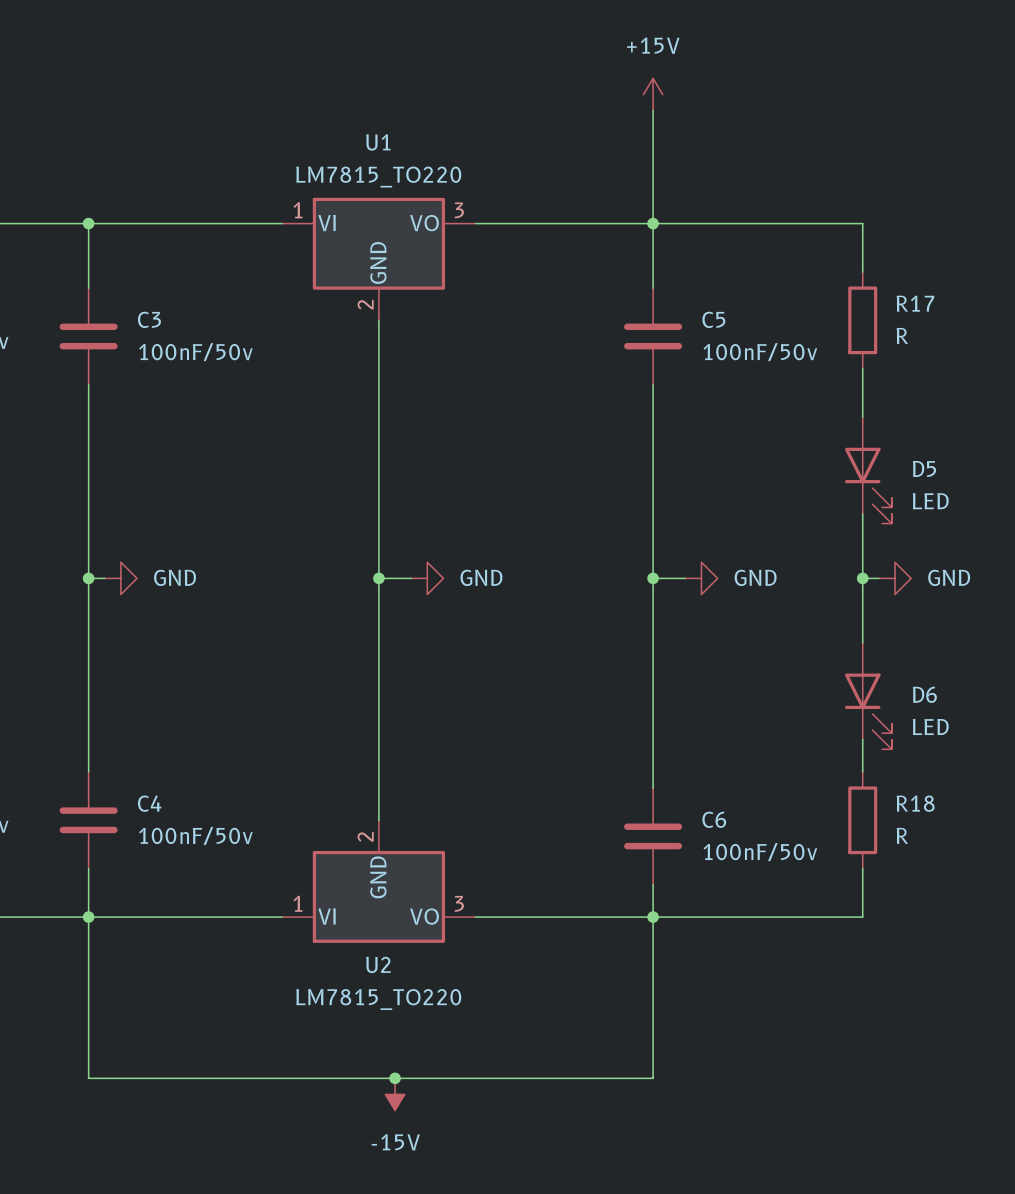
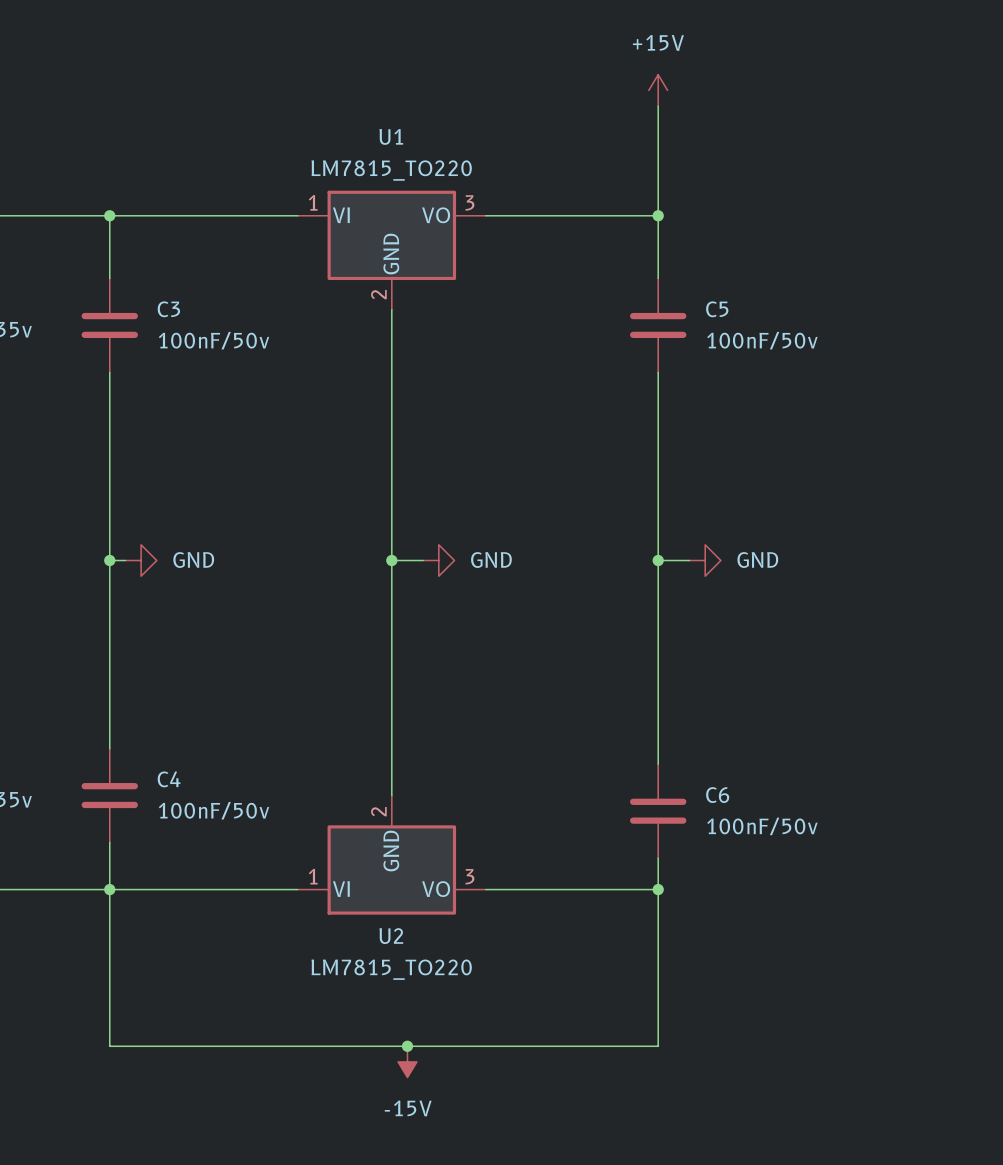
wire: (653, 223) (862, 223) (862, 271) -> none
R17: R (862, 320) -> none
wire: (862, 368) (862, 417) -> none
D5: LED (868, 470) -> none
wire: (862, 513) (862, 642) -> none
wire: (862, 578) (878, 578) -> none
junction: (862, 578) -> none
power symbol: GND (894, 578) -> none
D6: LED (868, 696) -> none
wire: (862, 739) (862, 771) -> none
R18: R (862, 820) -> none
wire: (862, 868) (862, 917) (653, 917) -> none

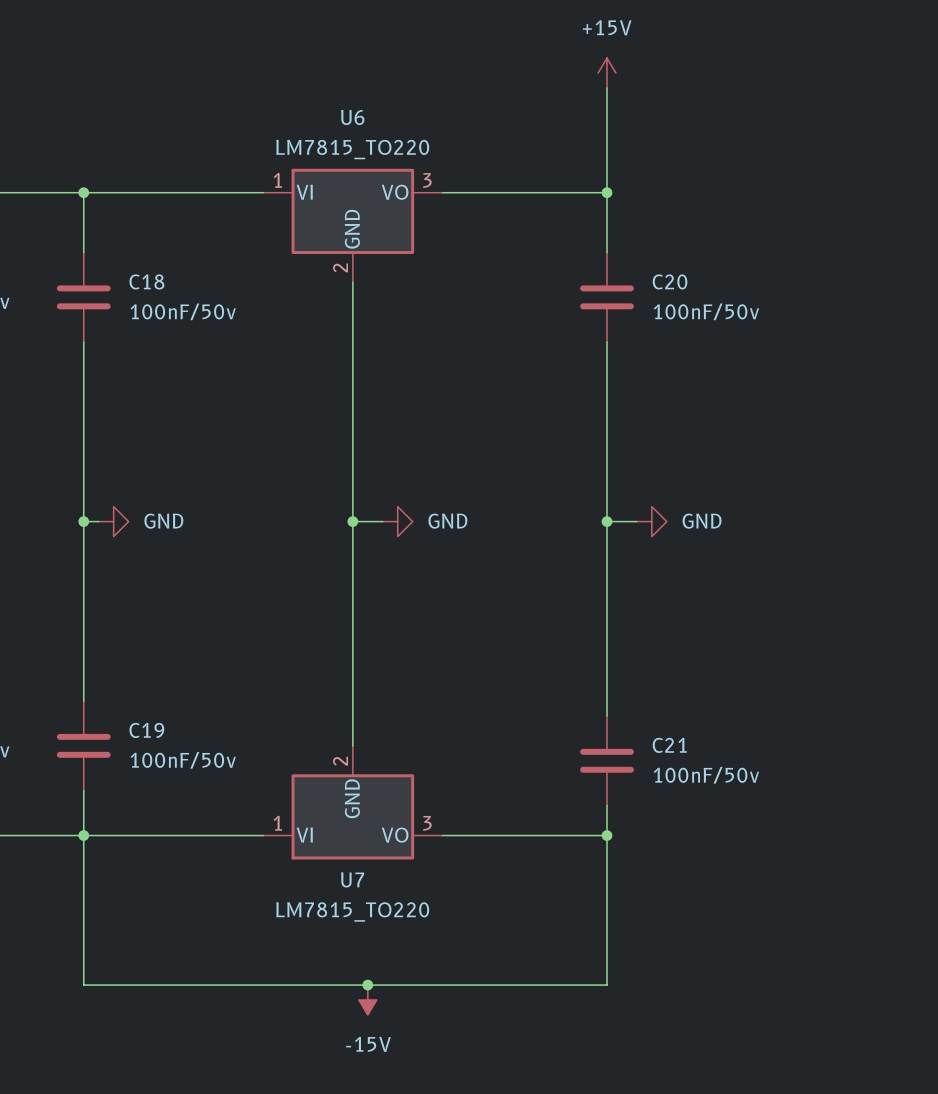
U1 name: U1 (391, 136) -> U6 (352, 117)
C3 name: C3 (168, 309) -> C18 (146, 281)
C5 name: C5 (717, 309) -> C20 (670, 281)
C4 name: C4 (169, 779) -> C19 (146, 730)
C6 name: C6 (717, 795) -> C21 (669, 745)
U2 name: U2 (391, 936) -> U7 (352, 879)

